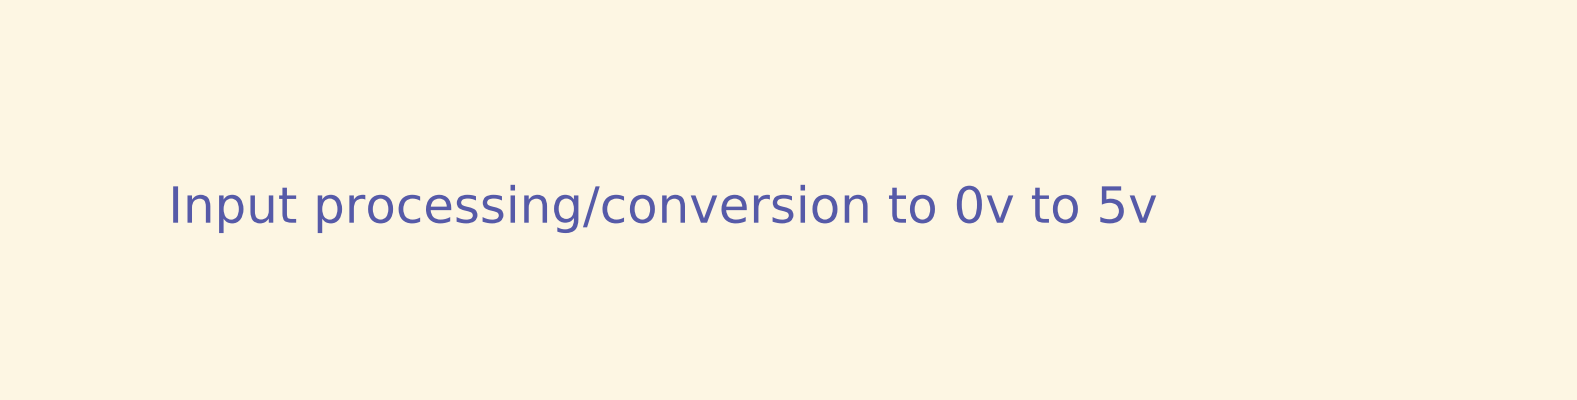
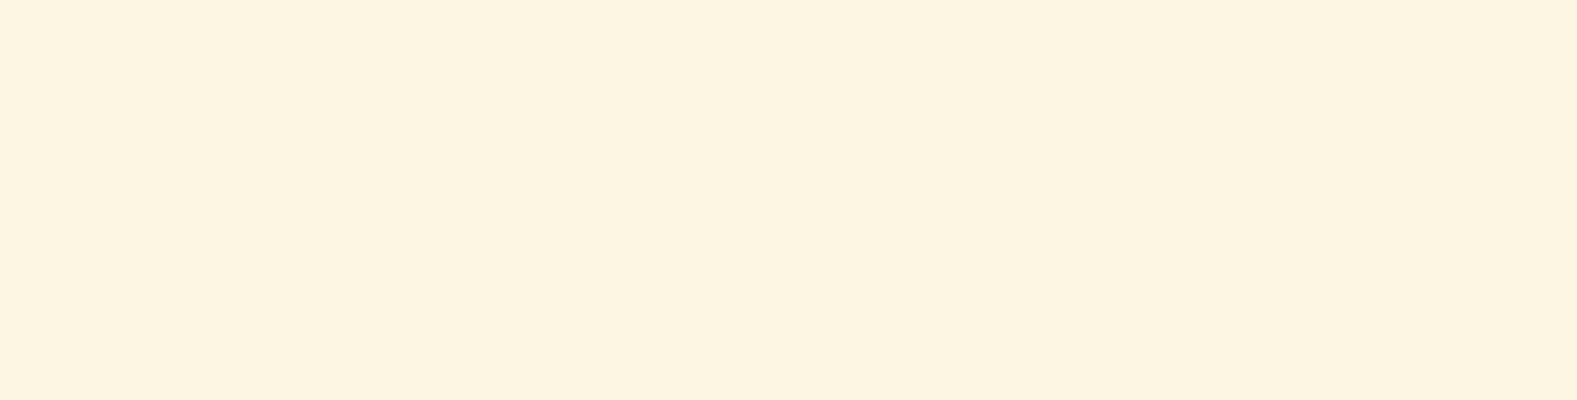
text: Input processing/conversion to 0v to 5v (664, 208) -> none

